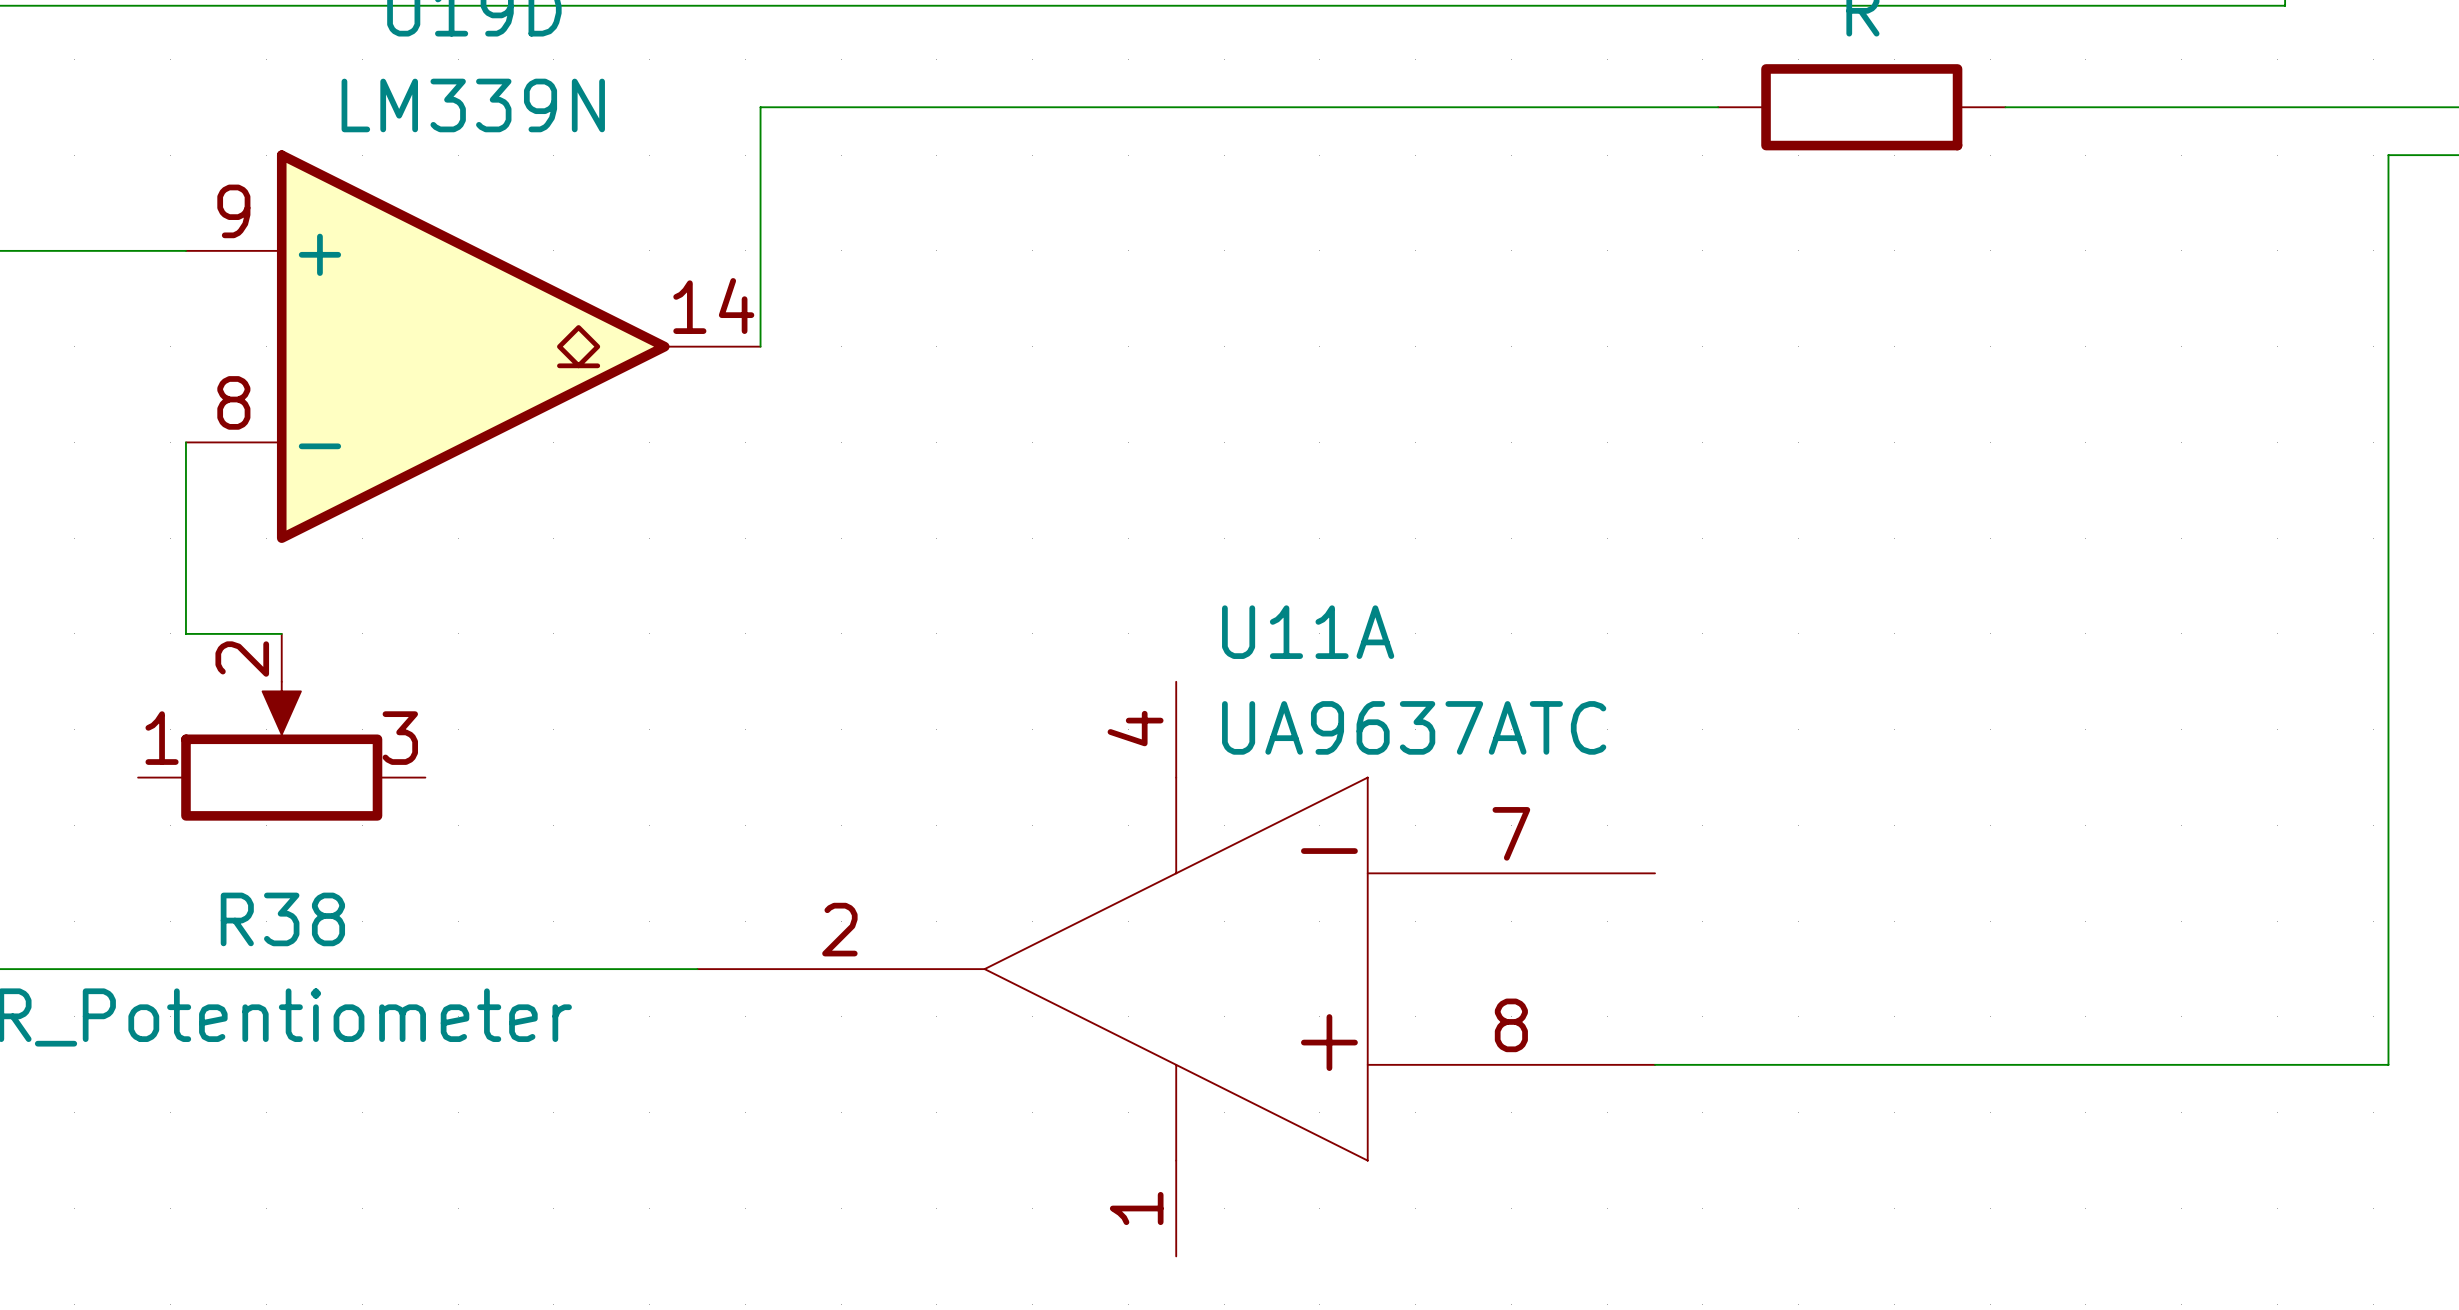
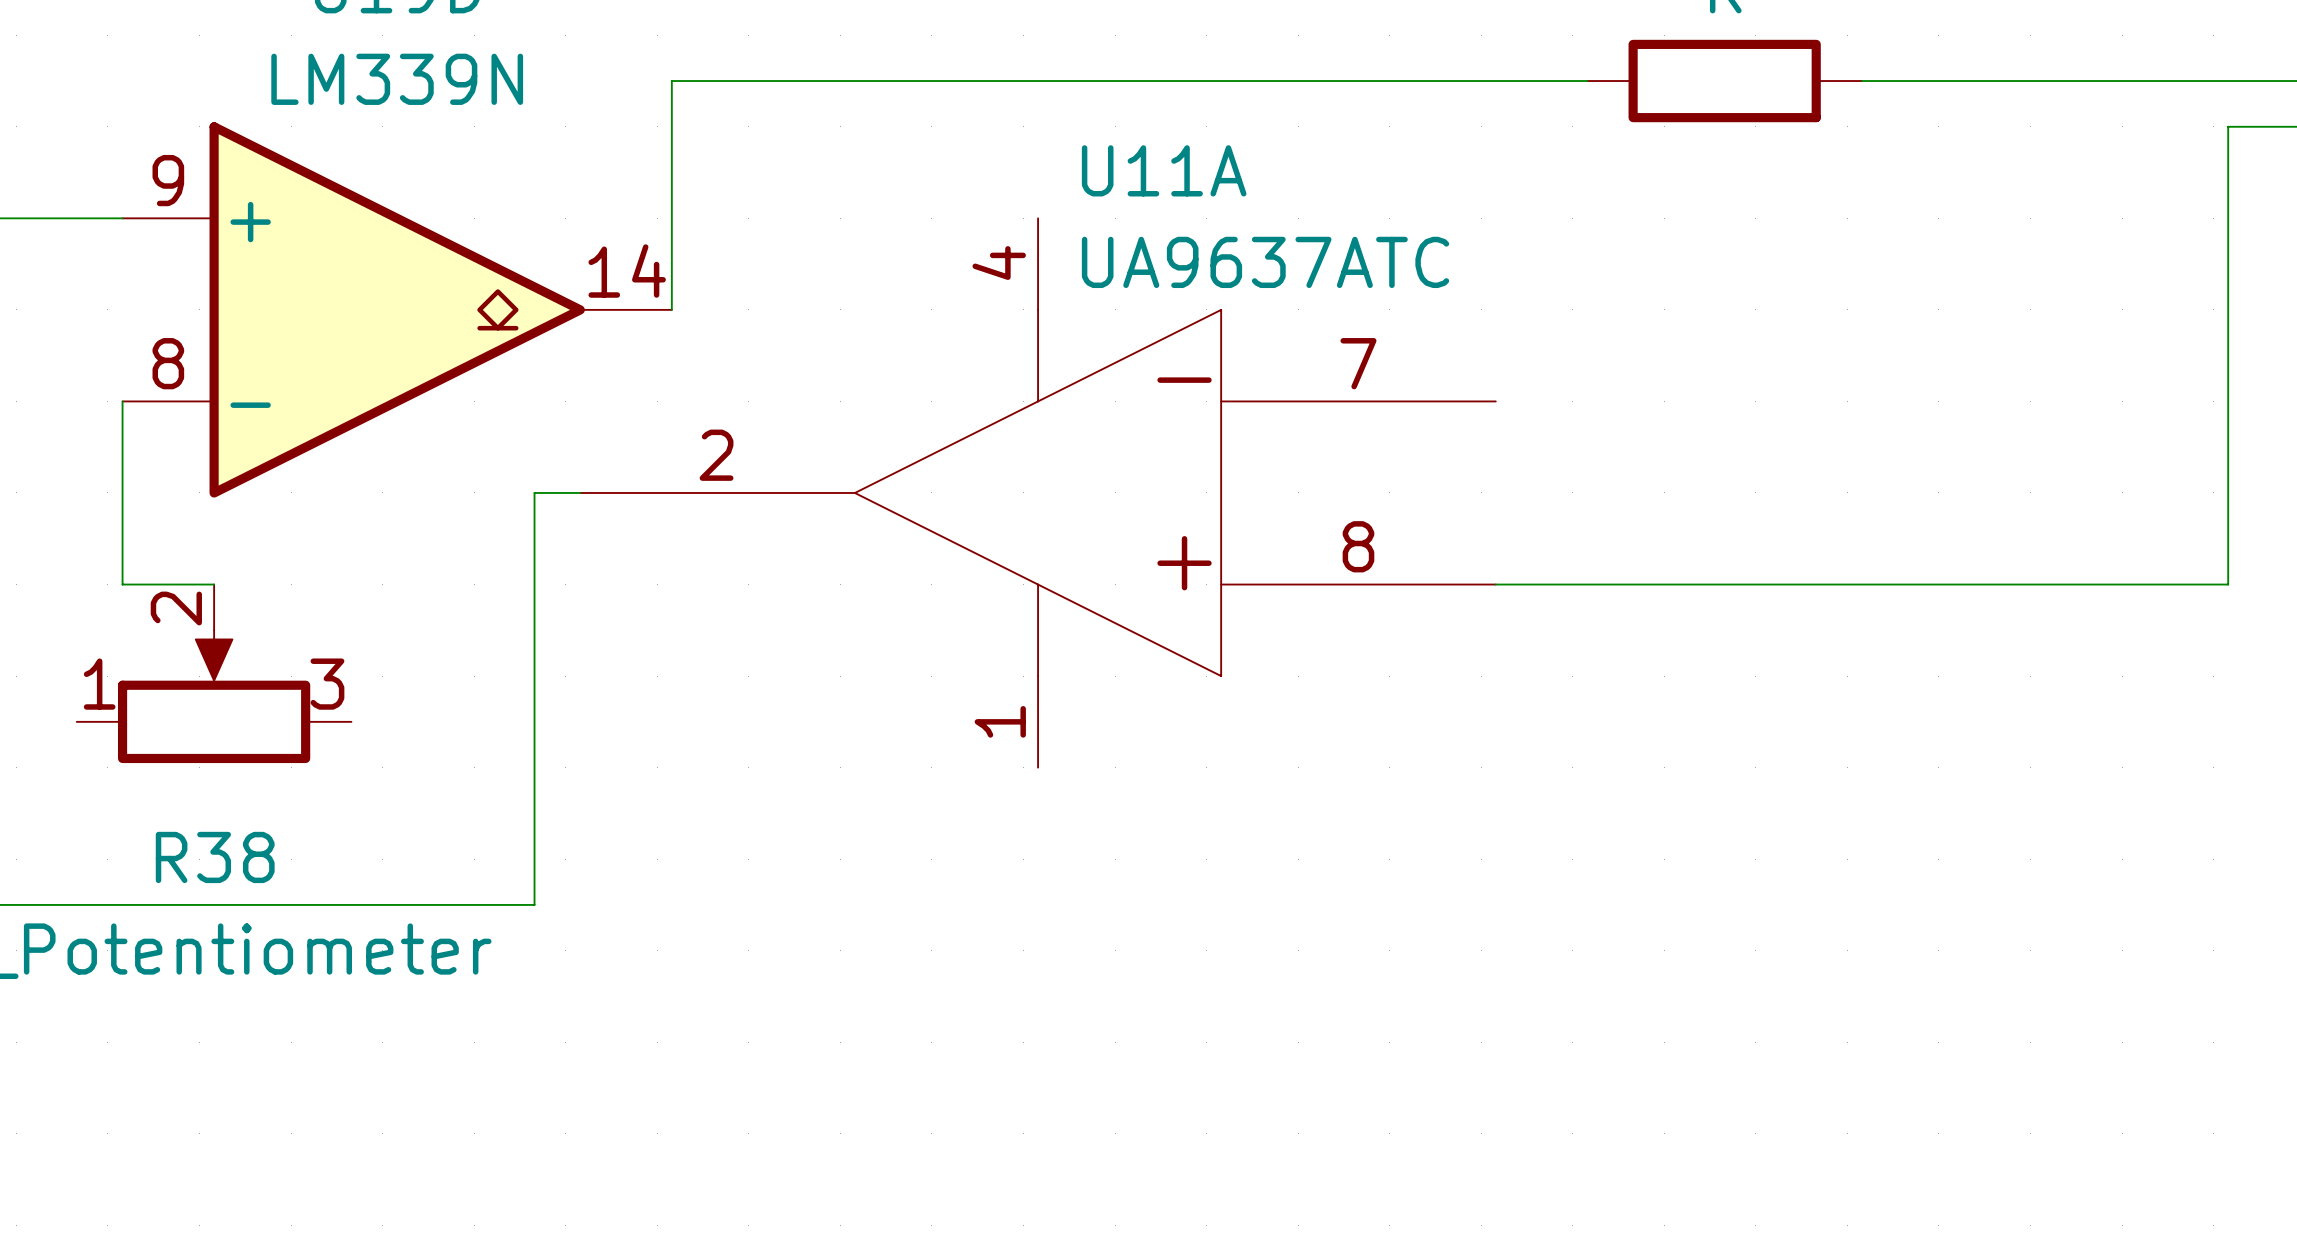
wire: (2388, 633) (2388, 1064) (1655, 1064) -> (2228, 584) (1495, 584)
wire: (616, 969) (697, 969) -> (534, 904) (534, 492) (580, 492)
U11A position: (1176, 969) -> (1038, 492)

